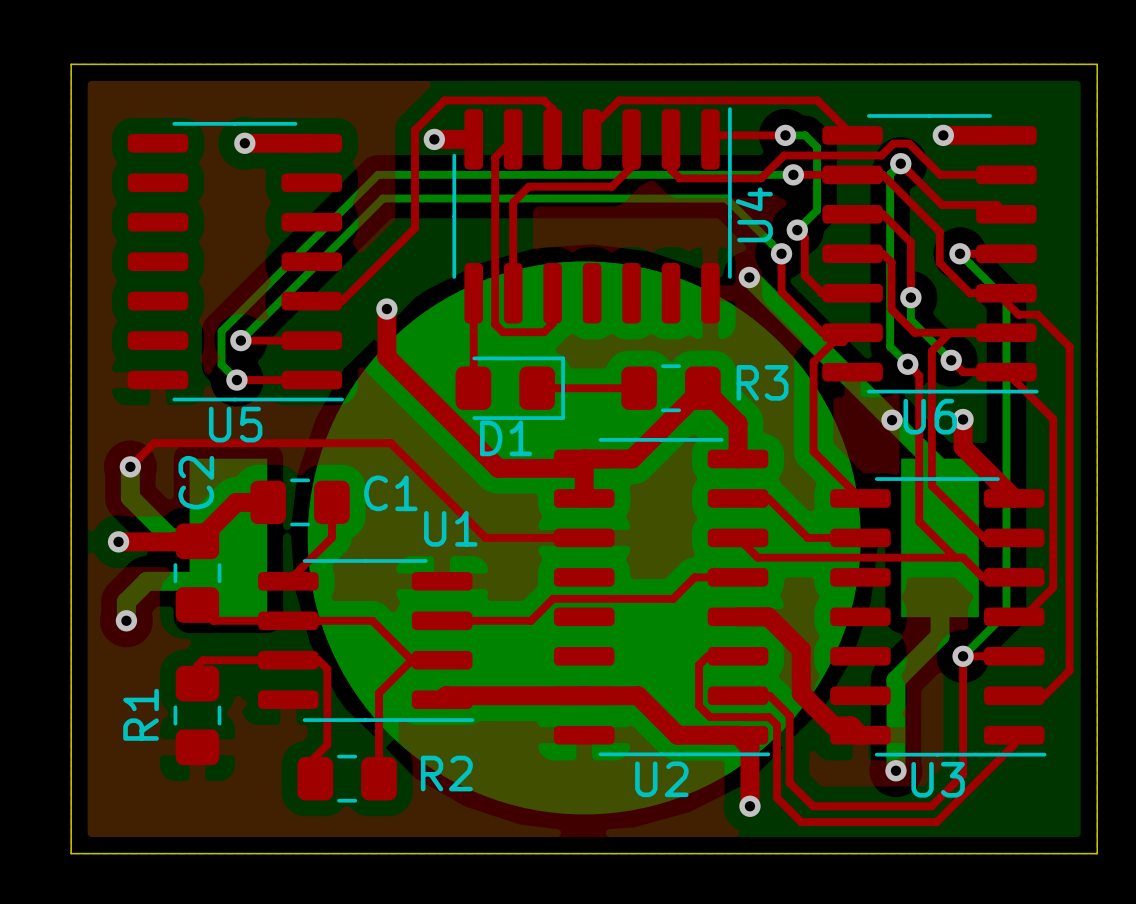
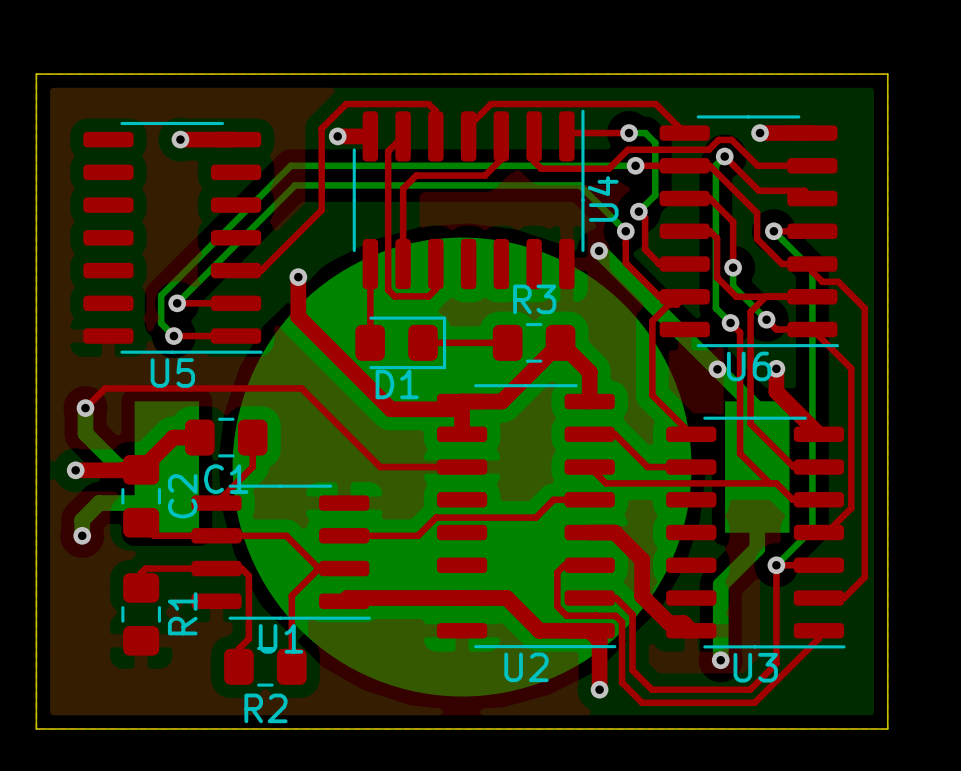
R3 name position: R3 (762, 382) -> R3 (534, 299)
C2 name position: C2 (196, 482) -> C2 (182, 496)
C1 name position: C1 (390, 493) -> C1 (226, 479)
U1 name position: U1 (450, 528) -> U1 (280, 638)
R1 name position: R1 (141, 714) -> R1 (182, 613)
R2 name position: R2 (446, 773) -> R2 (265, 708)

